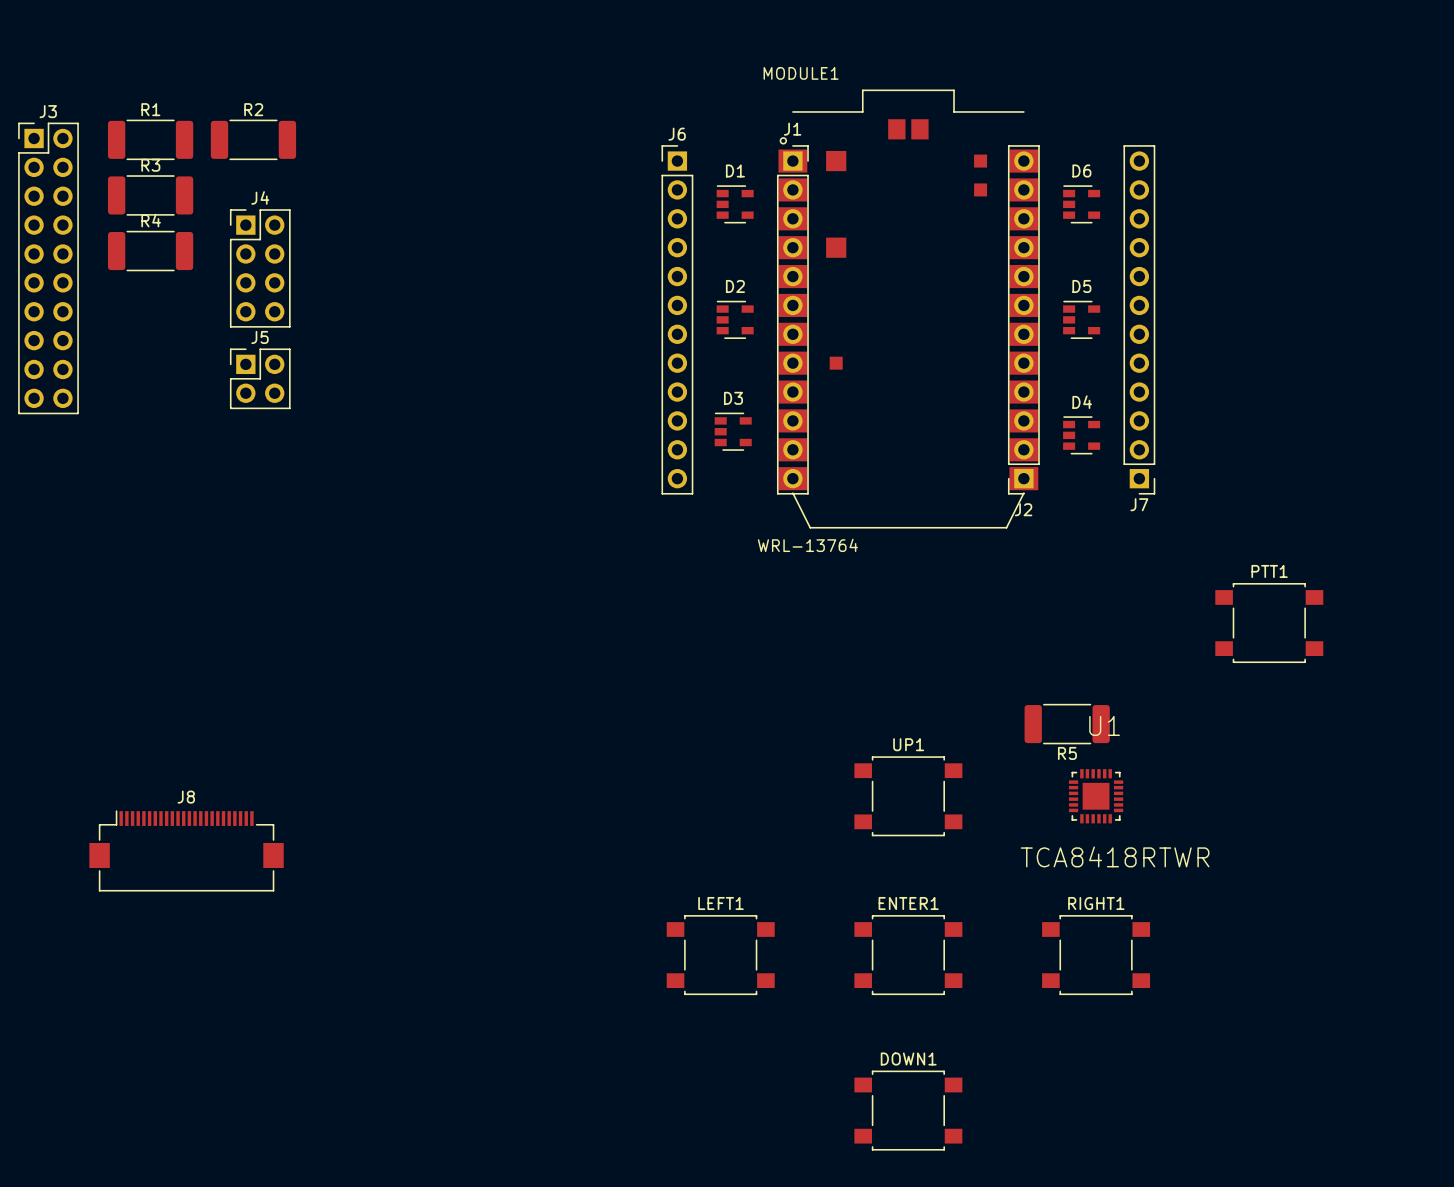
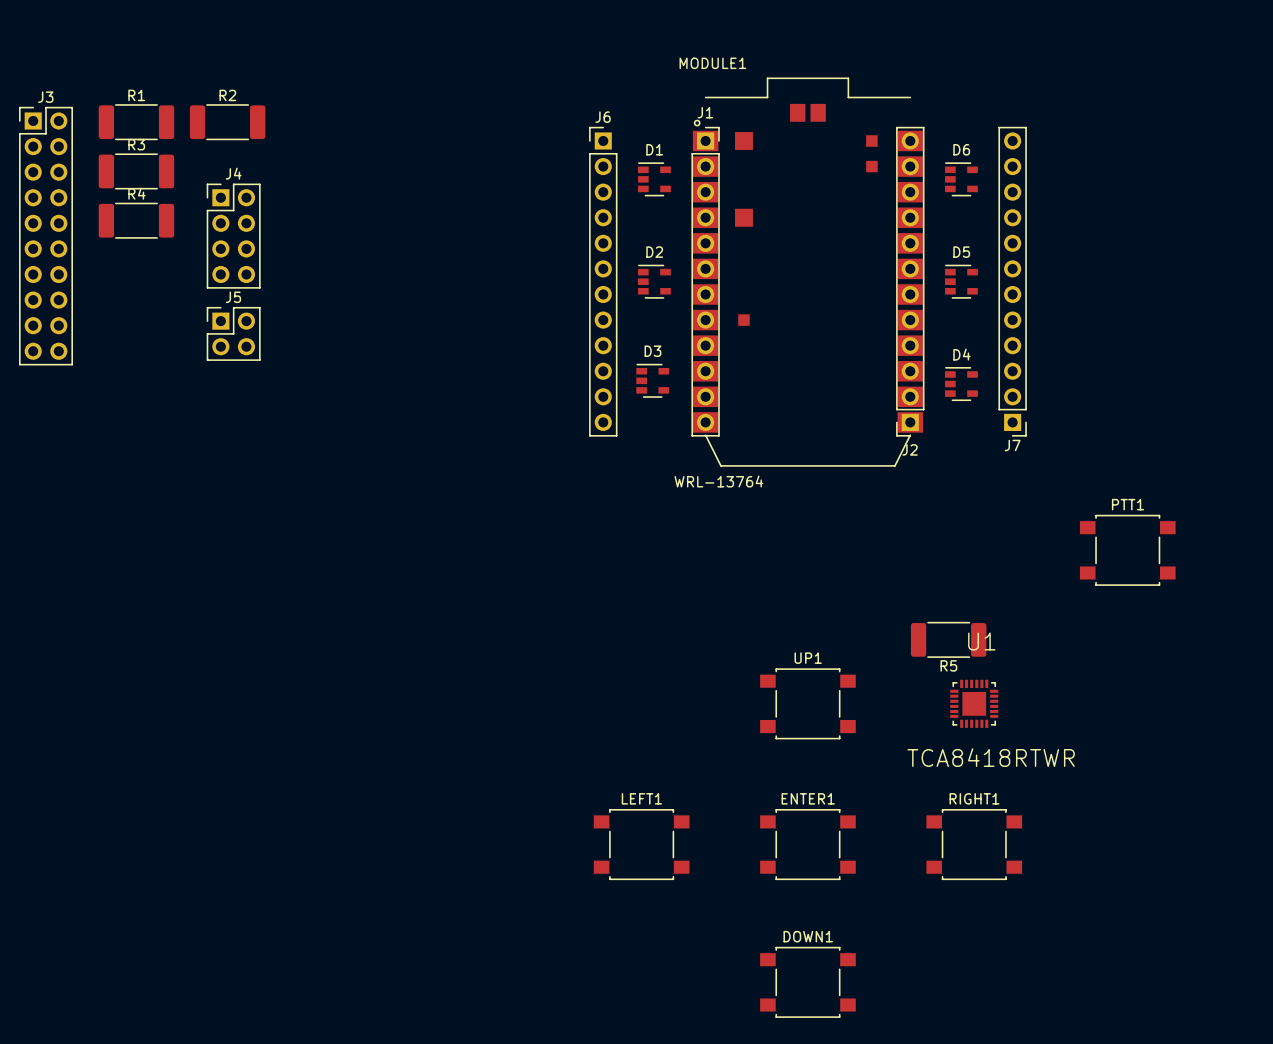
J8: (186, 850) -> none

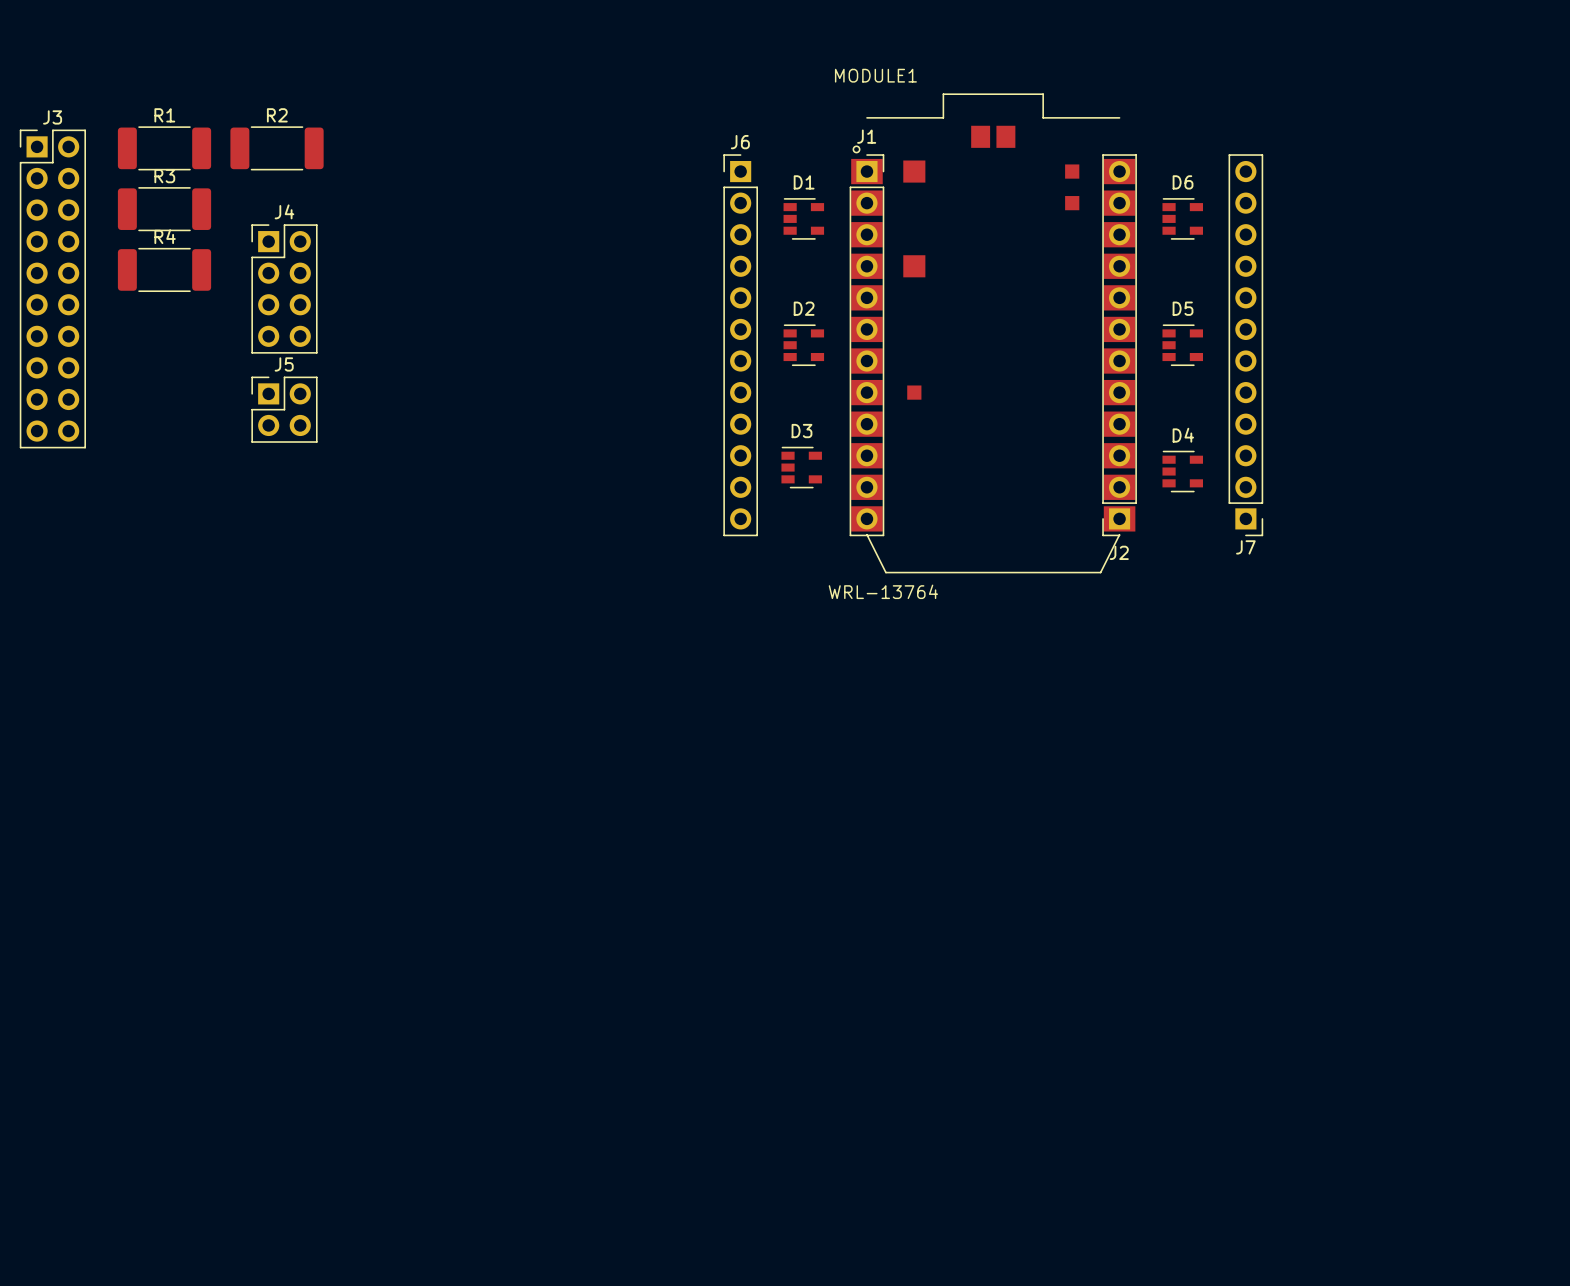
PTT1: (1127, 550) -> none
R5: (948, 639) -> none
UP1: (807, 703) -> none
U1: TCA8418RTWR (974, 703) -> none
LEFT1: (641, 844) -> none
ENTER1: (807, 844) -> none
RIGHT1: (974, 844) -> none
DOWN1: (807, 982) -> none

